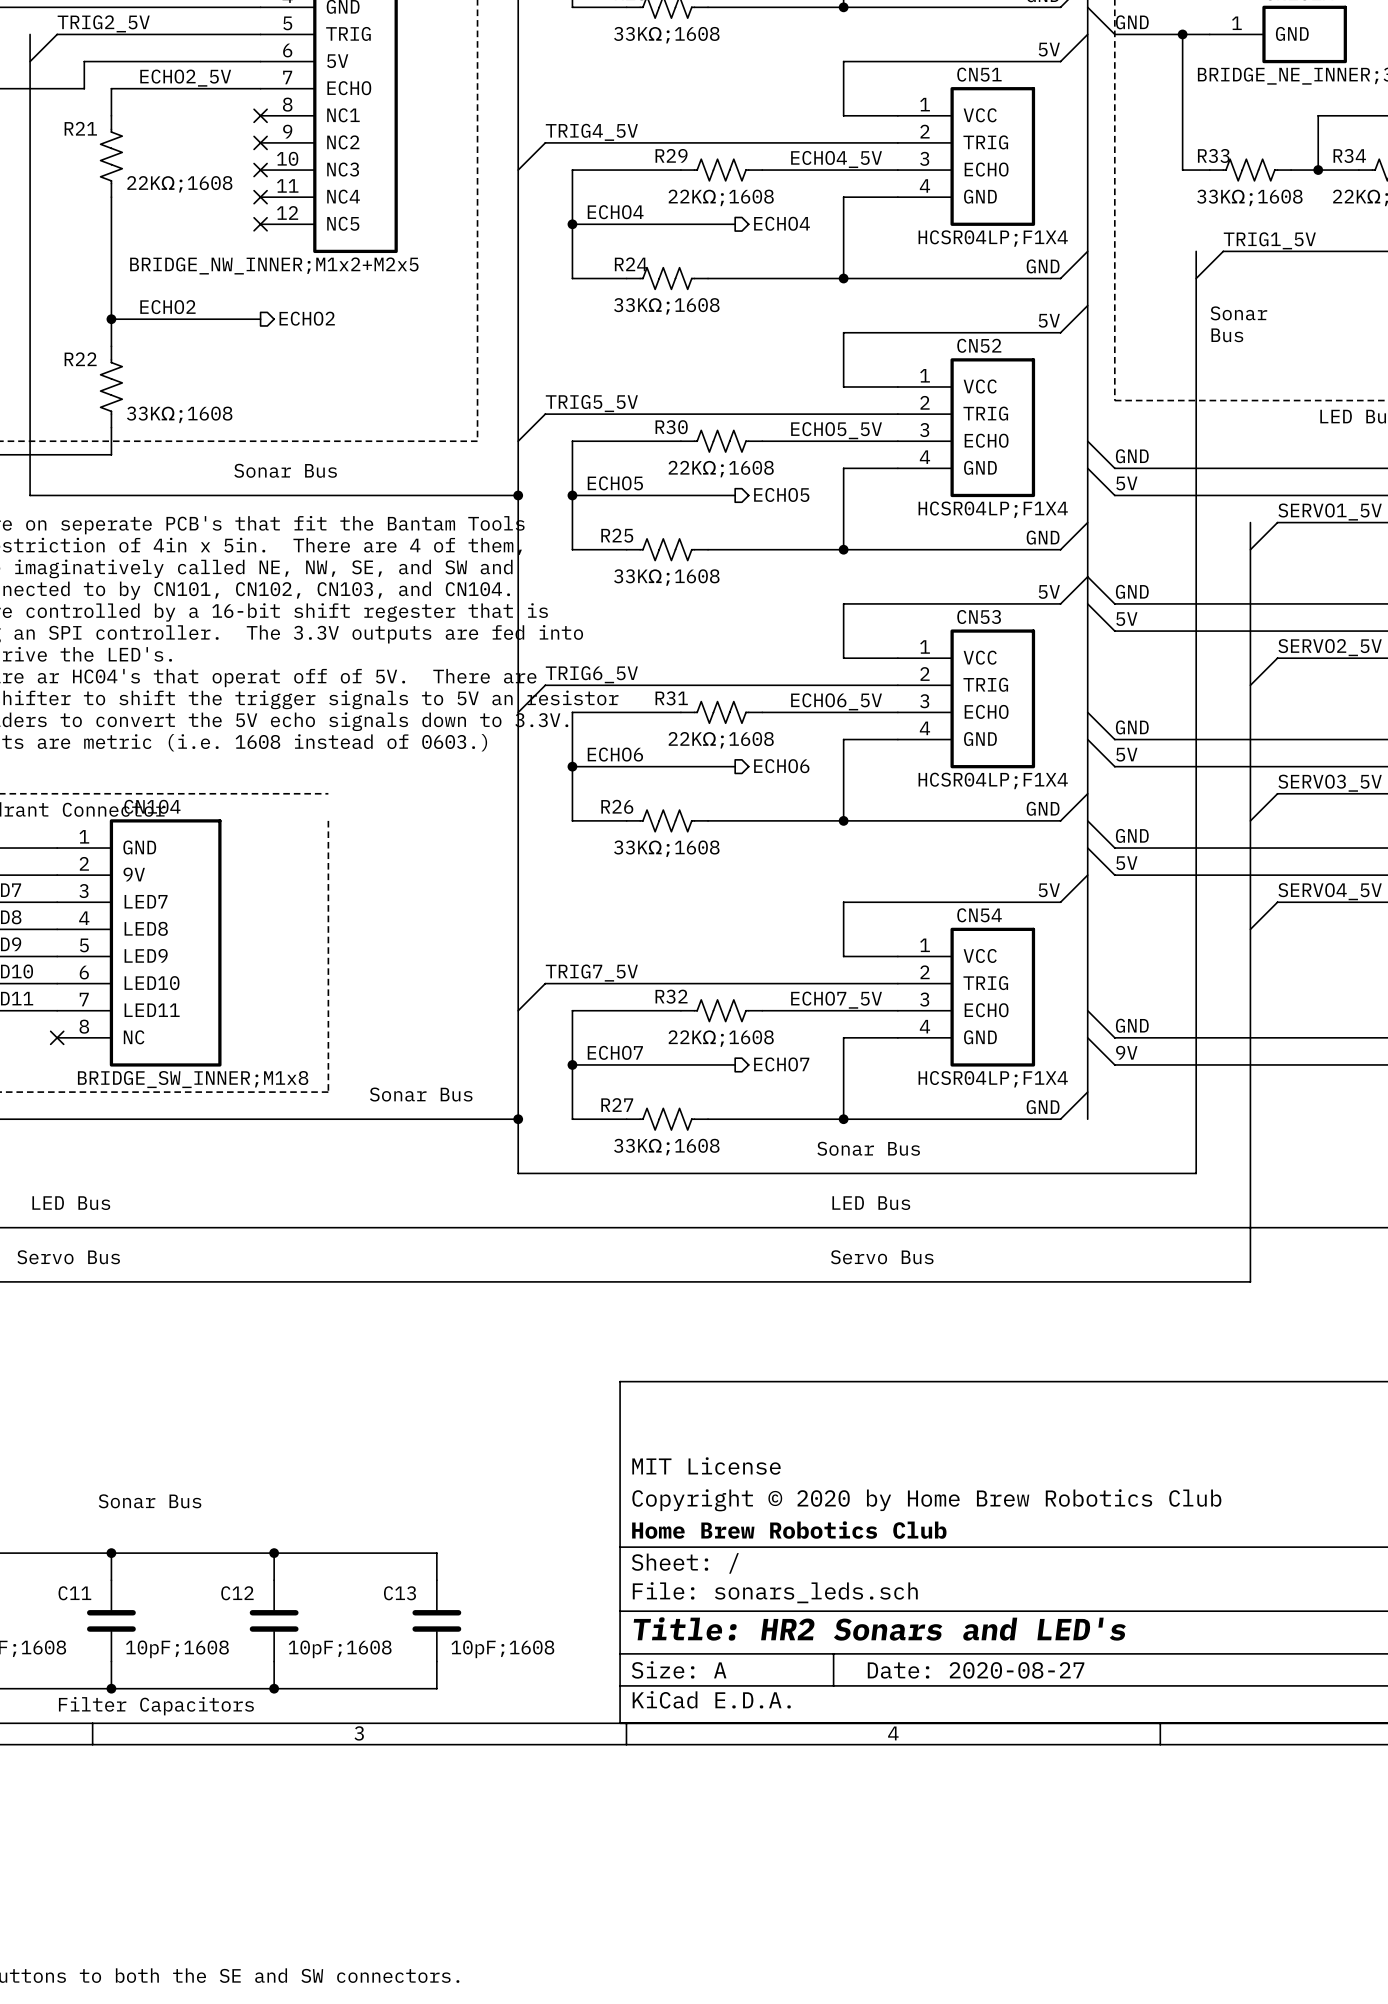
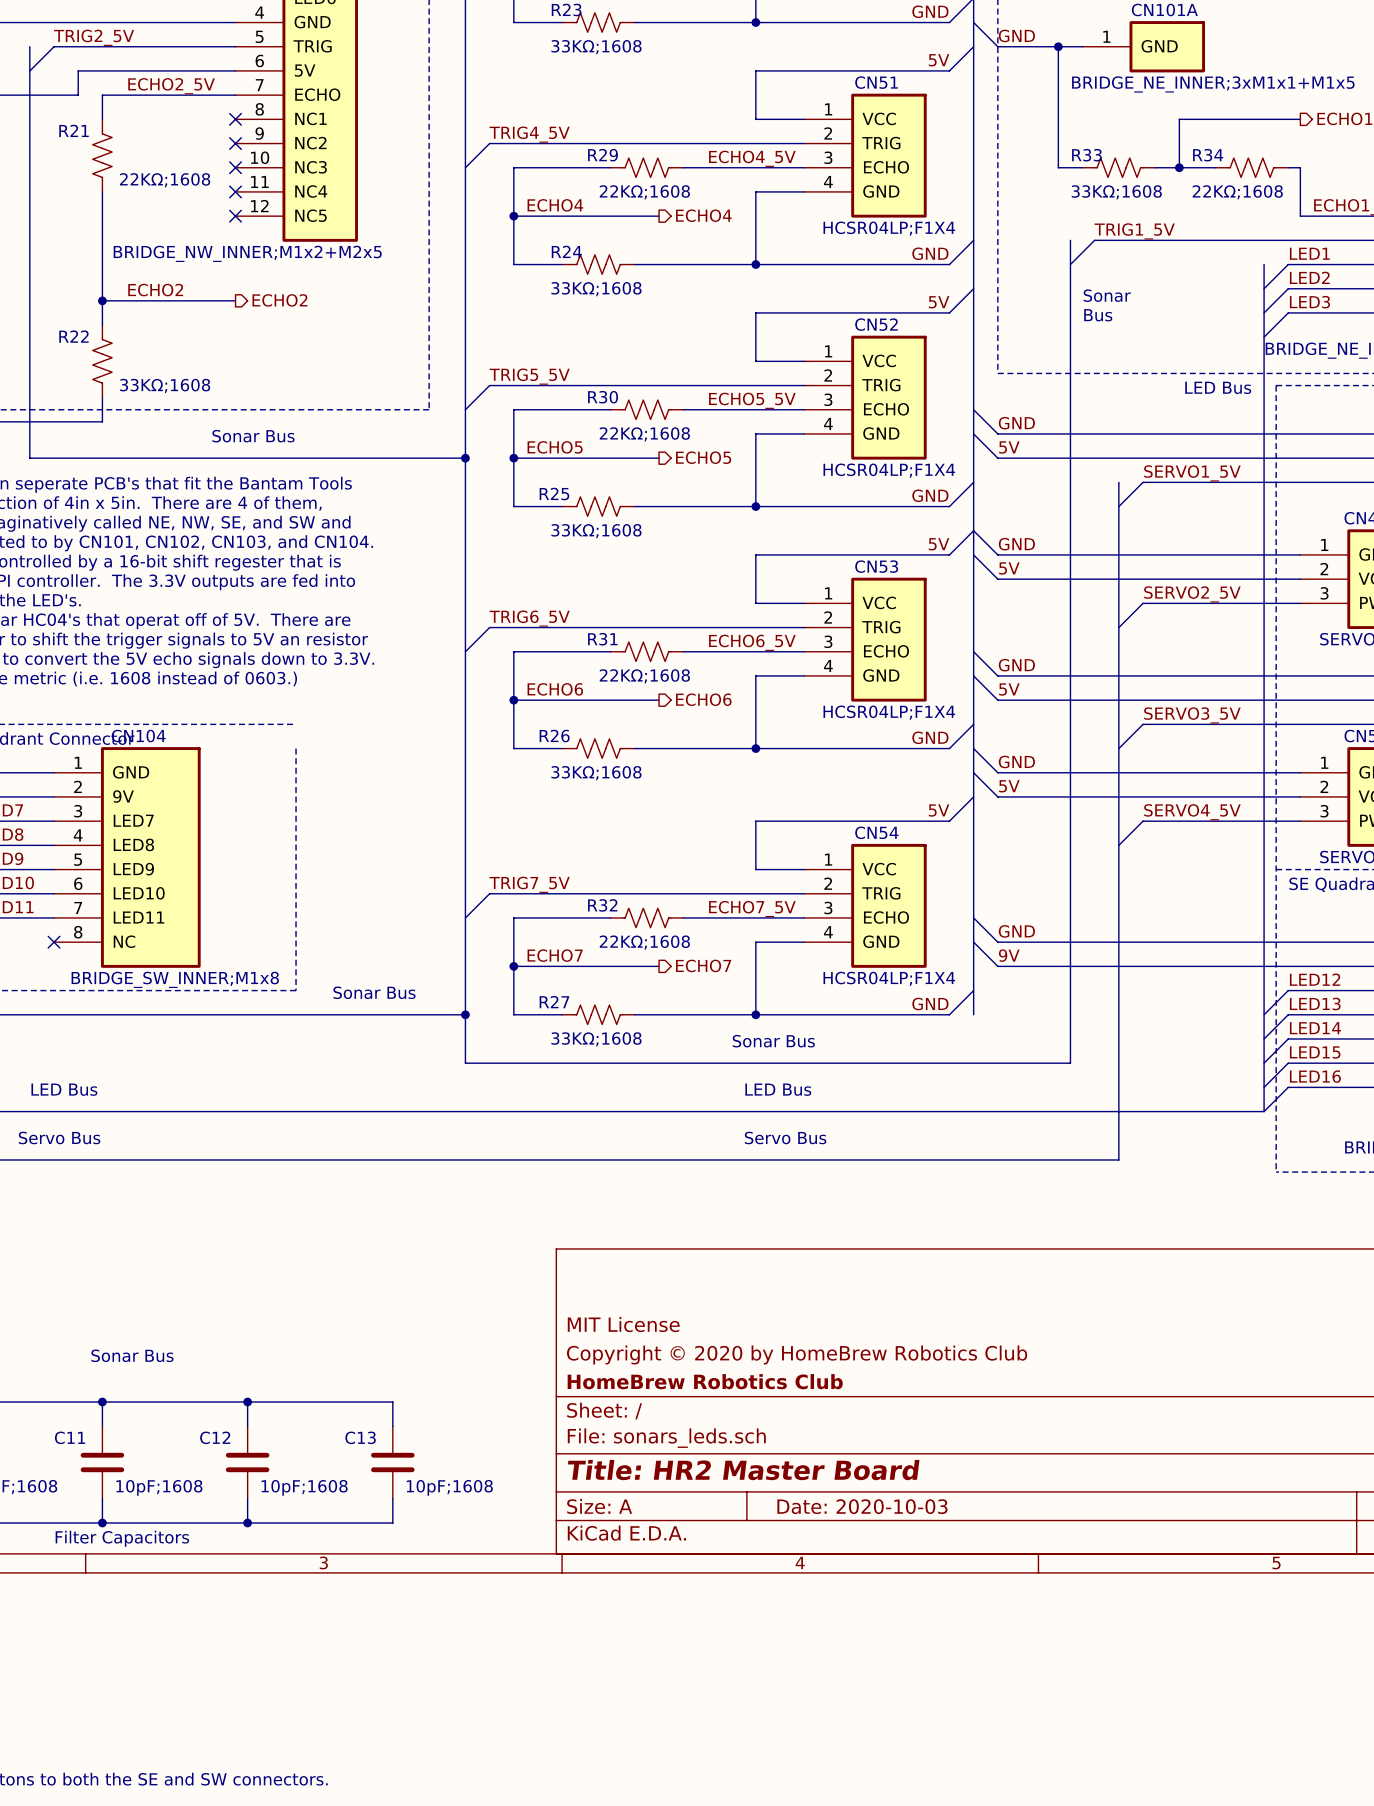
title block: Copyright © 2020 by Home Brew Robotics Club (926, 1500) -> Copyright © 2020 by HomeBrew Robotics Club (797, 1354)
title block: Home Brew Robotics Club (789, 1530) -> HomeBrew Robotics Club (705, 1381)
title block: Title: HR2 Sonars and LED's (879, 1628) -> Title: HR2 Master Board (743, 1470)
title block: Date: 2020-08-27 (976, 1670) -> Date: 2020-10-03 (862, 1506)

